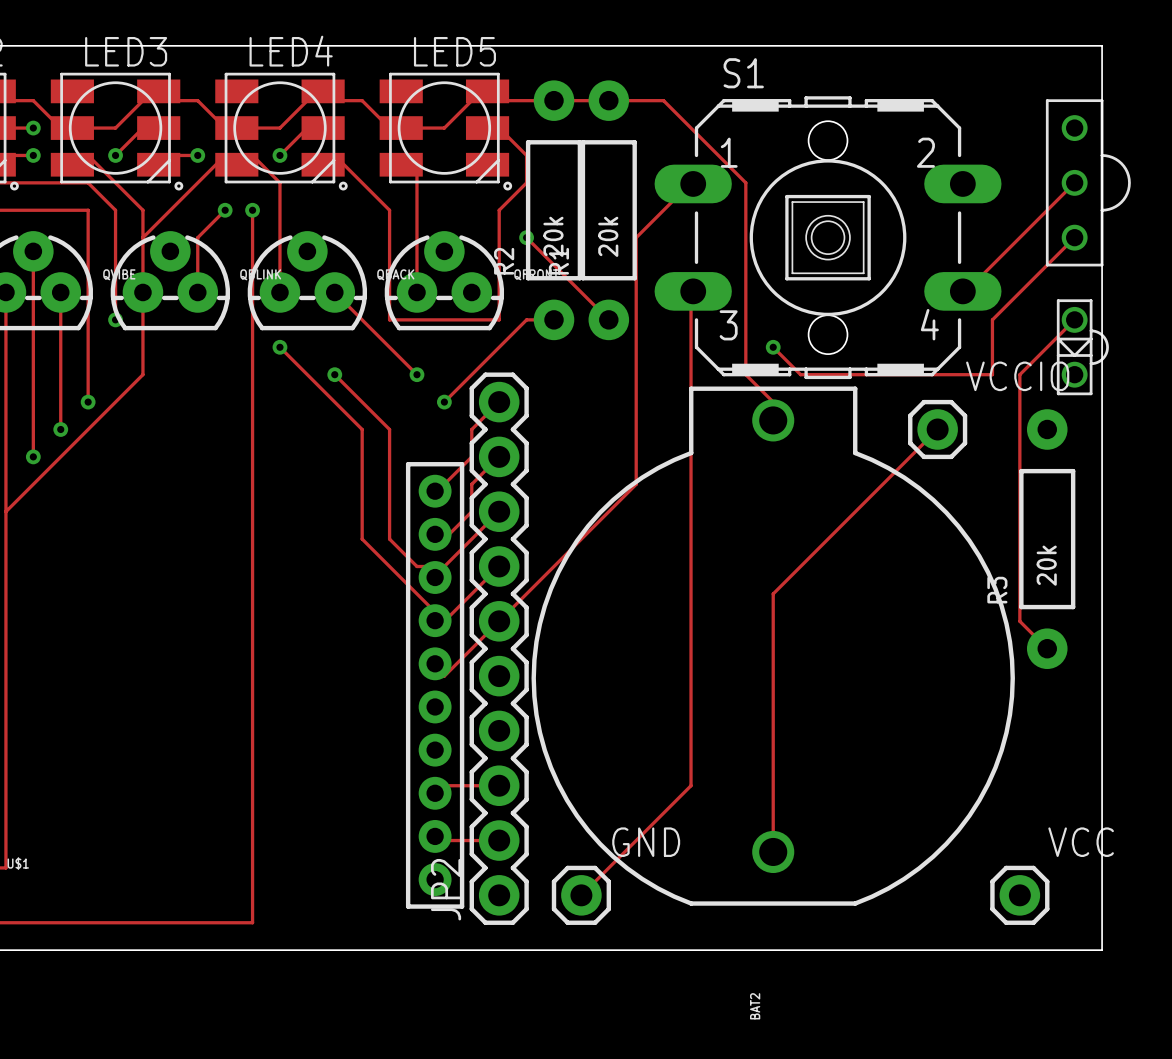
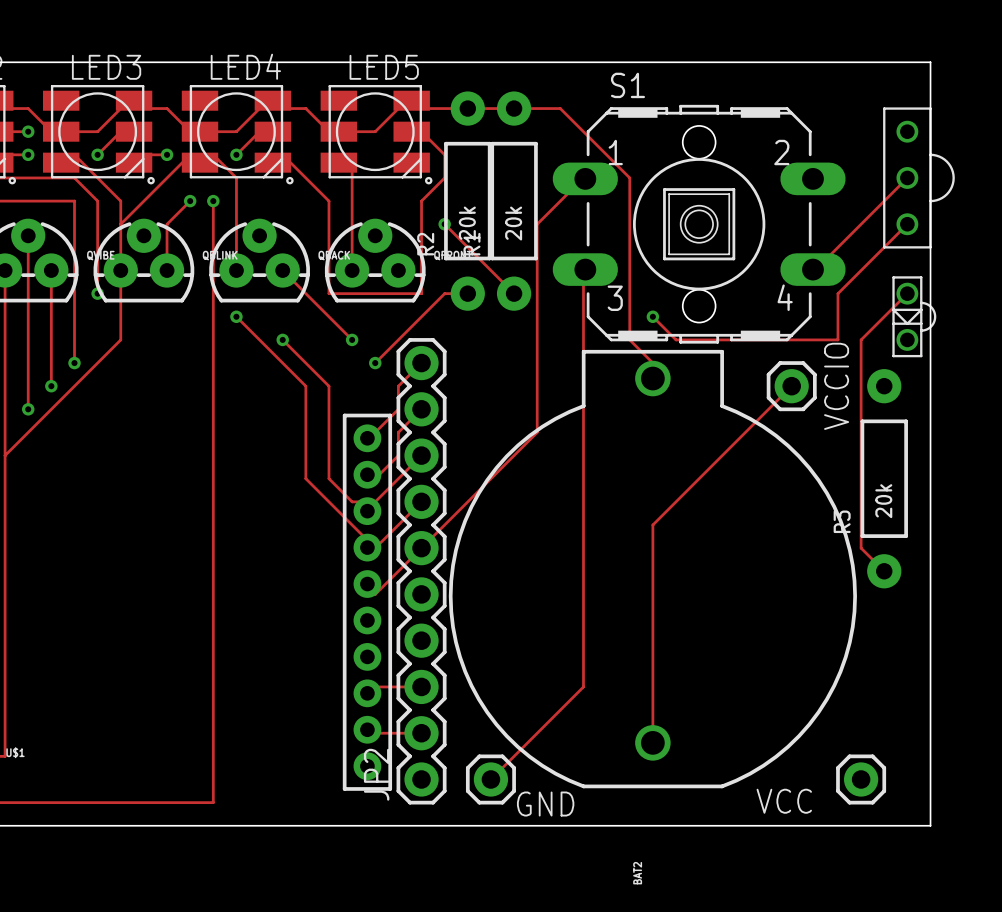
VCCIO name rotation: 0° (1017, 376) -> 90° counterclockwise (836, 386)
GND name position: GND (646, 842) -> GND (545, 804)
VCC name position: VCC (1081, 842) -> VCC (784, 801)

